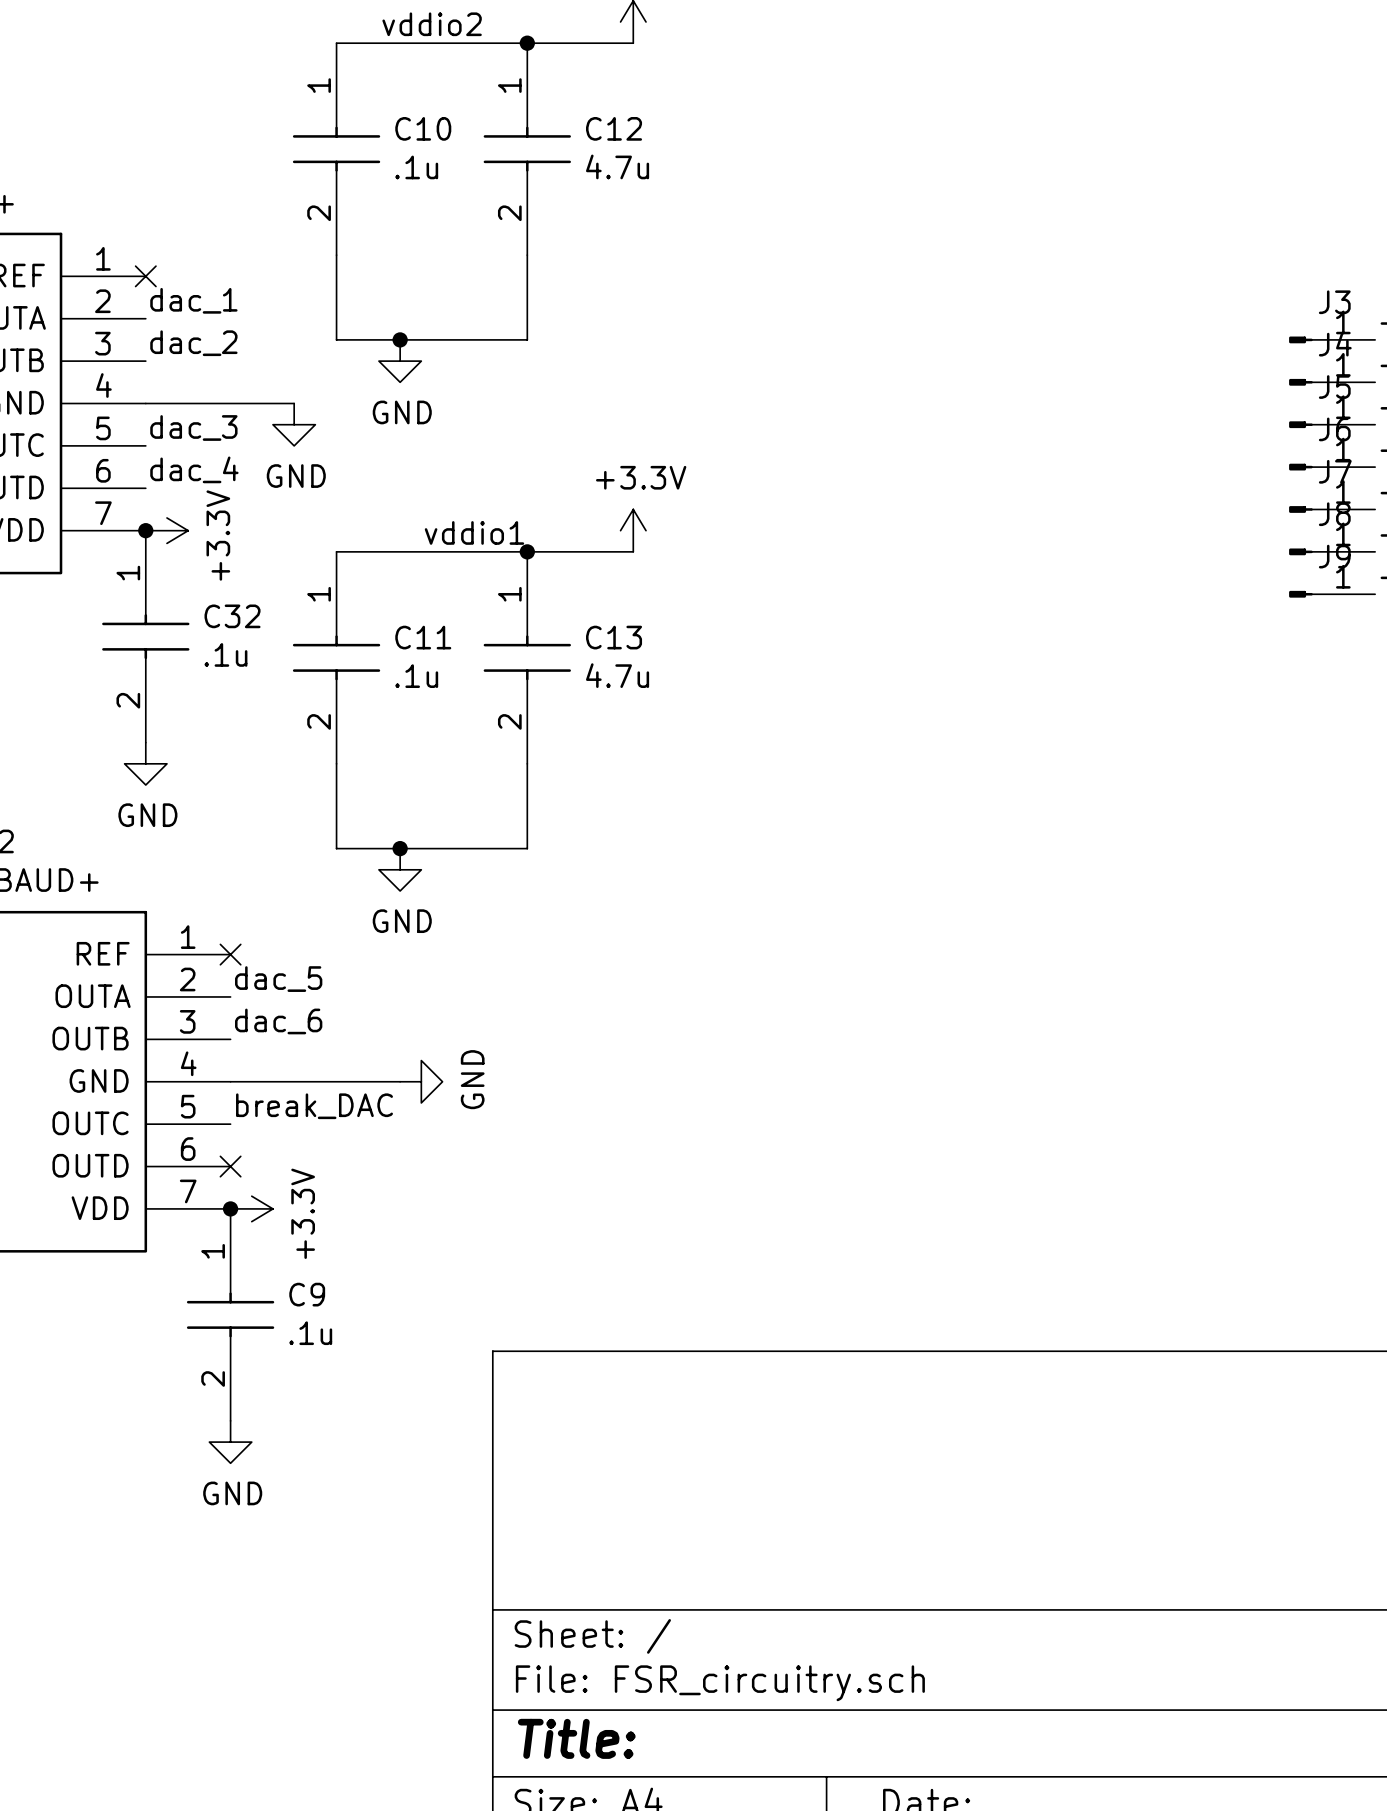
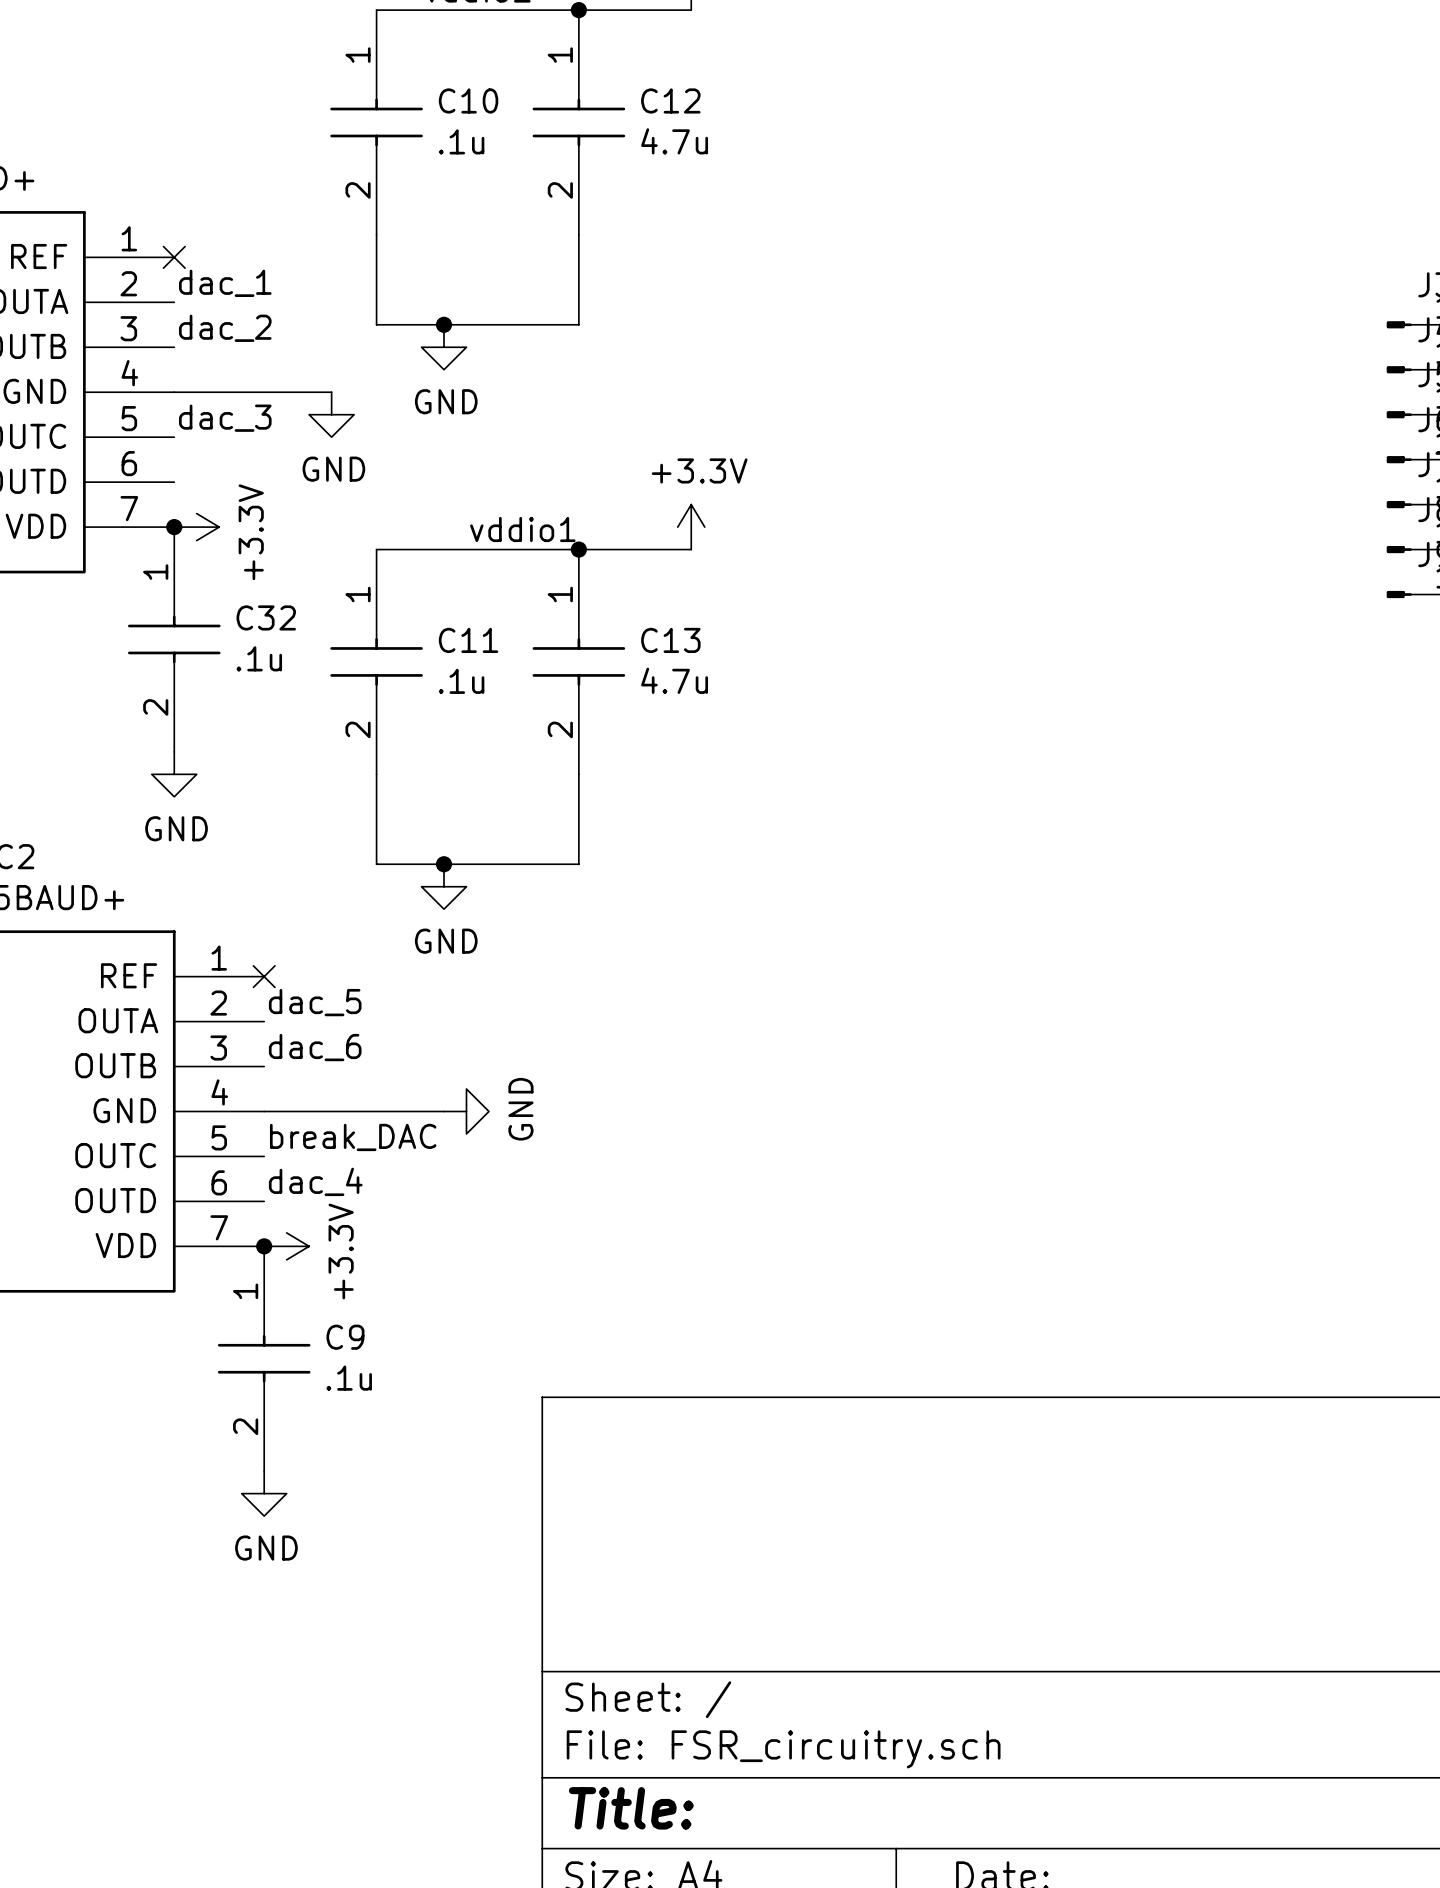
label: dac_4 (194, 469) -> none
label: none -> dac_4 (315, 1181)
no-connect mark: (230, 1166) -> none

